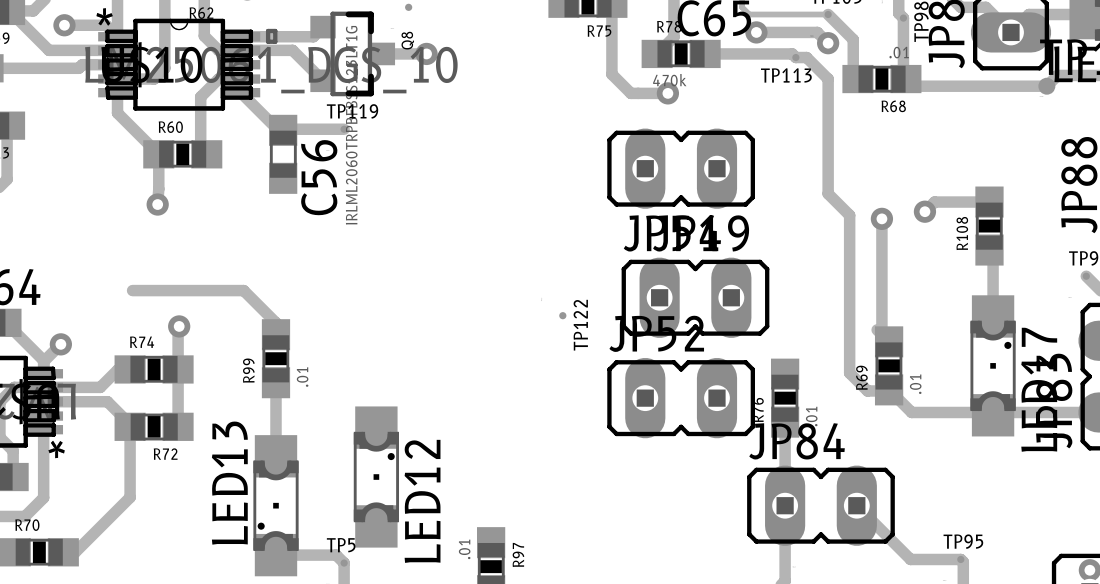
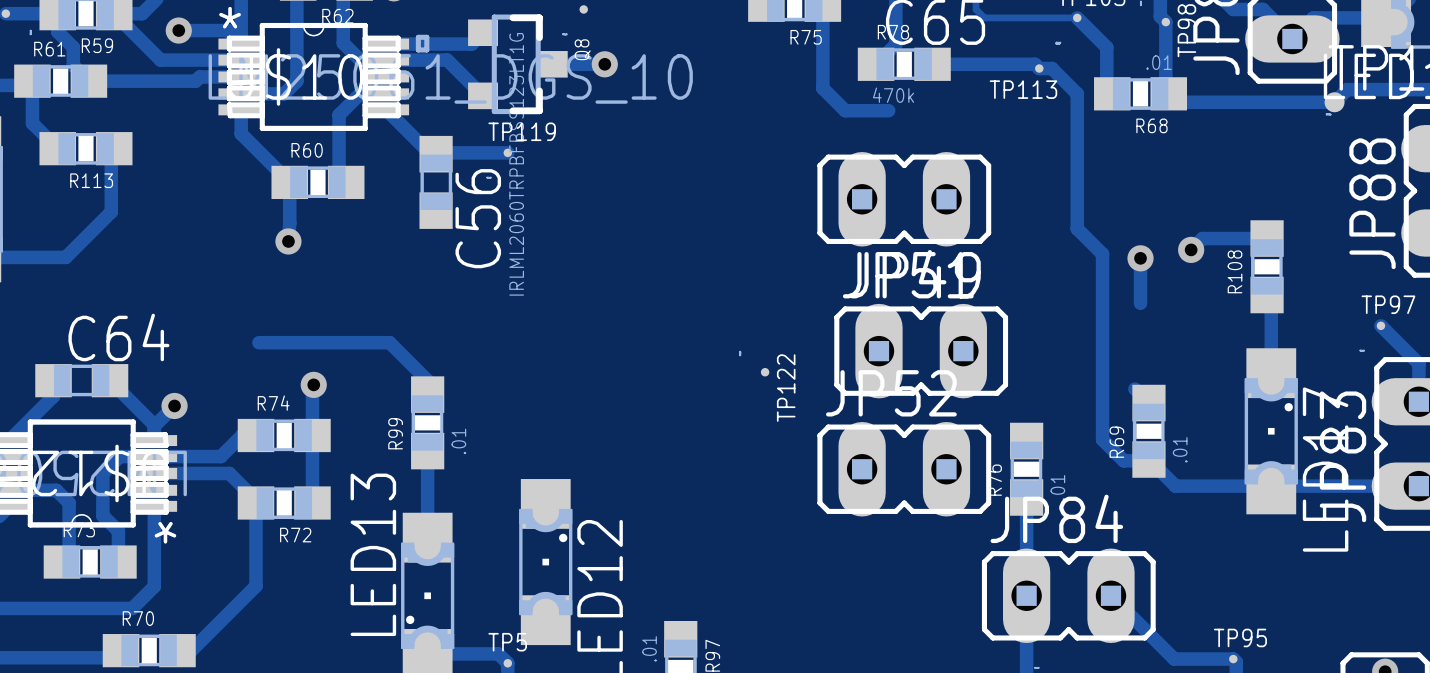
track: (756, 32) (817, 32) (828, 43) -> none
via: (756, 32) -> none
via: (828, 43) -> none
via: (667, 93) -> none
track: (881, 257) (881, 334) -> none

